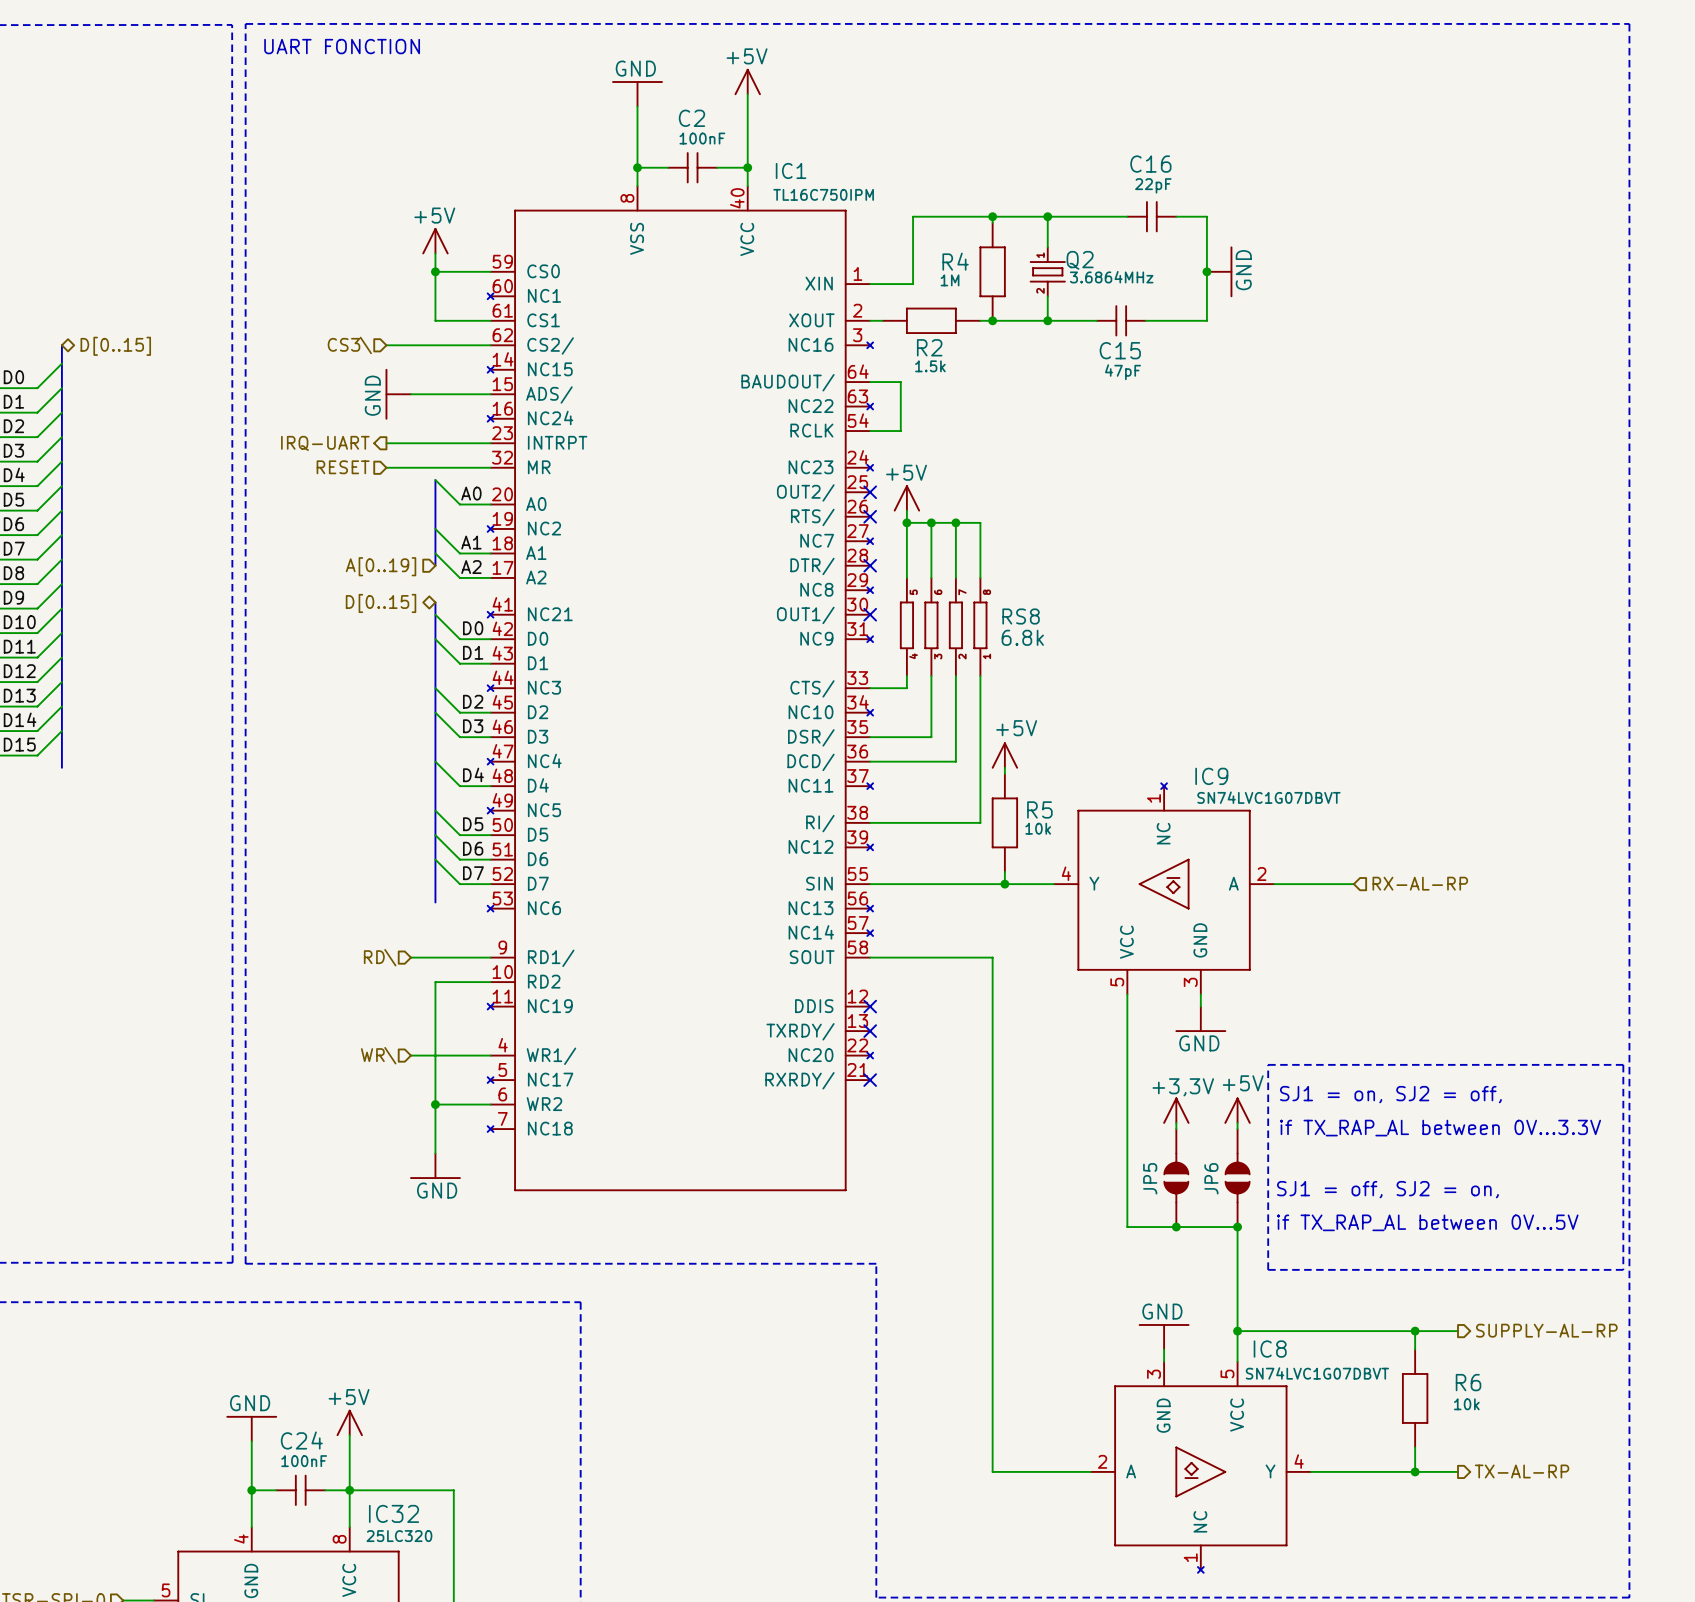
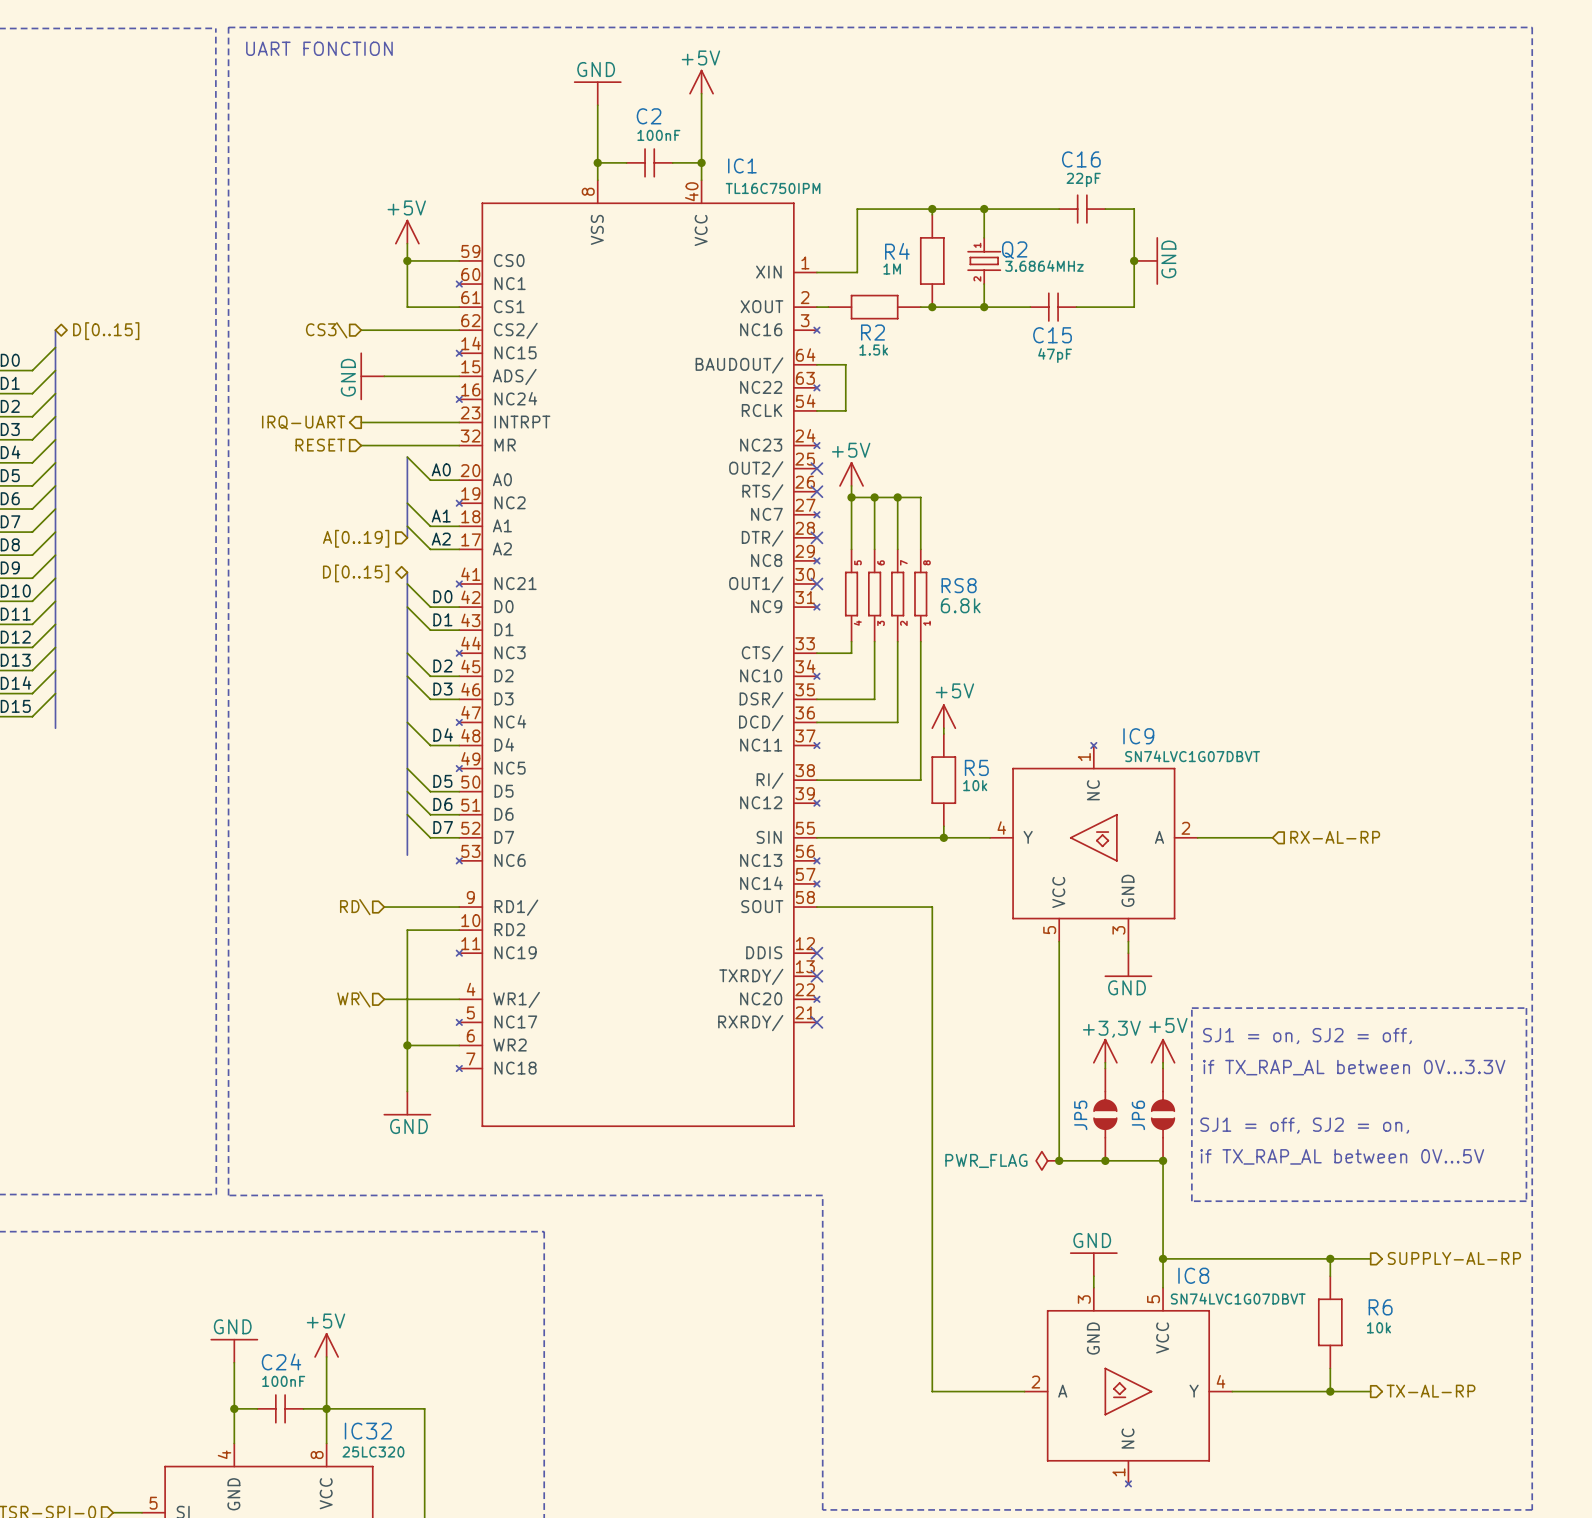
power symbol: none -> PWR_FLAG (1047, 1160)
junction: none -> (1059, 1160)

